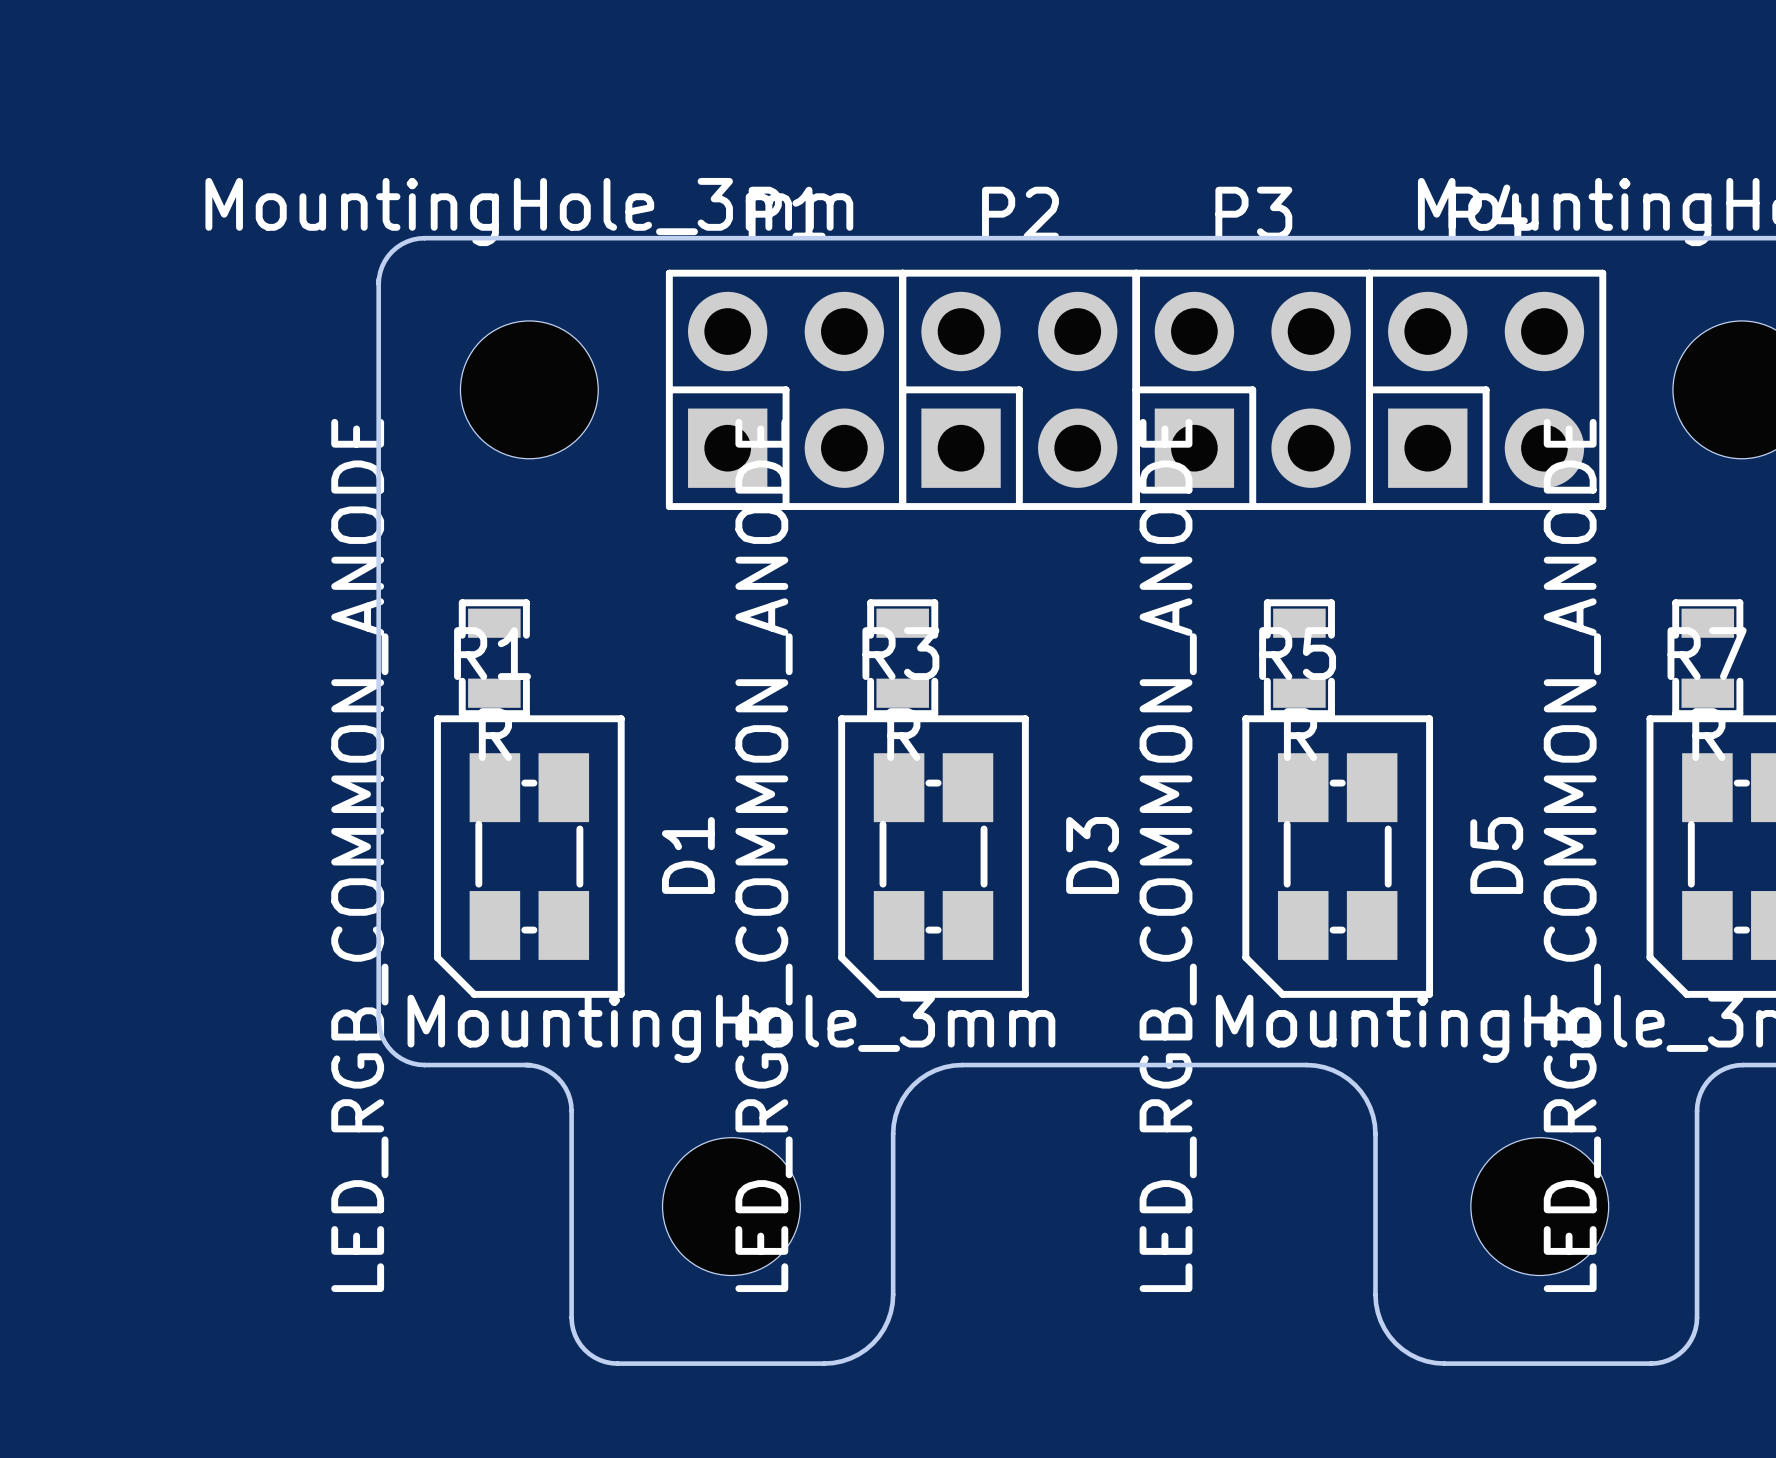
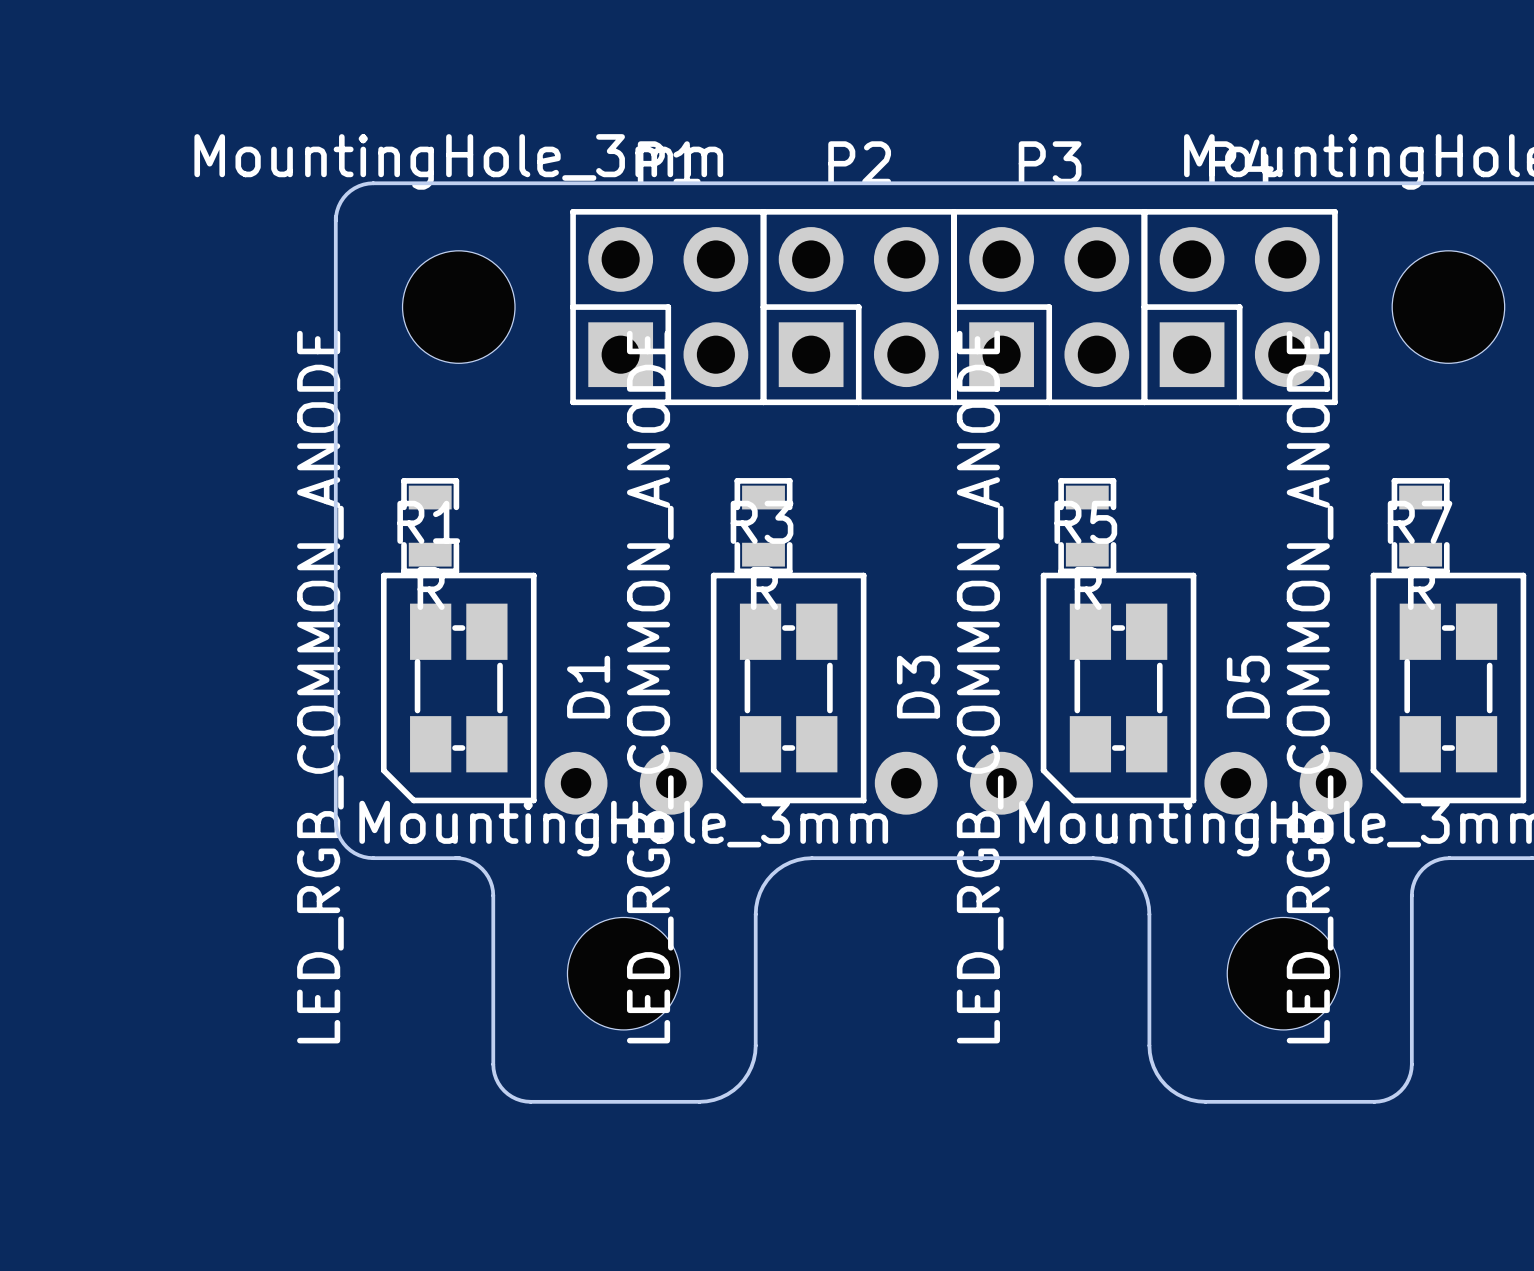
part: none -> (623, 783)
part: none -> (953, 783)
part: none -> (1283, 783)

